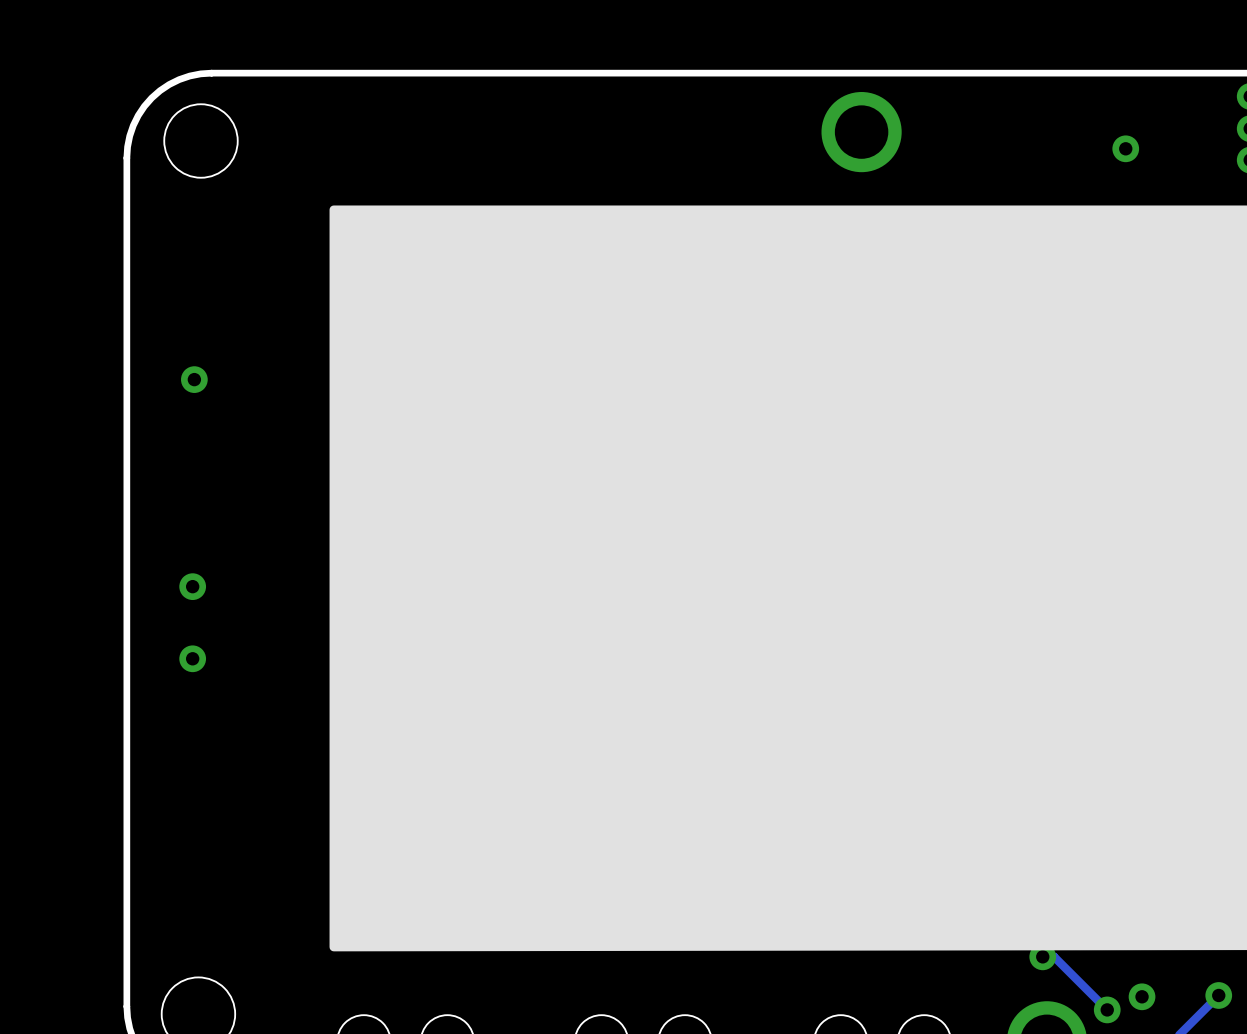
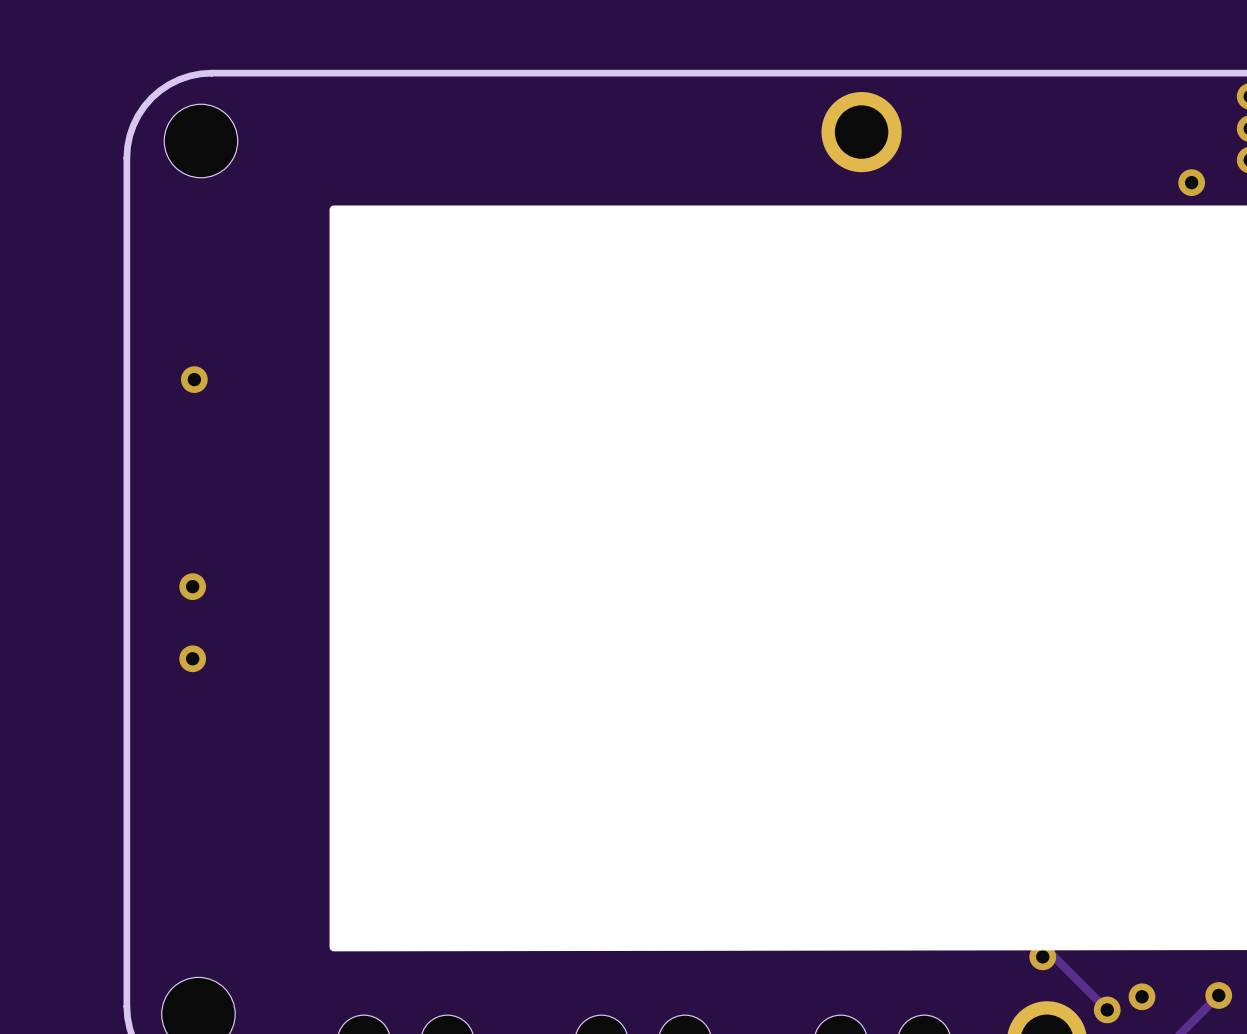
via position: (1125, 148) -> (1191, 182)

